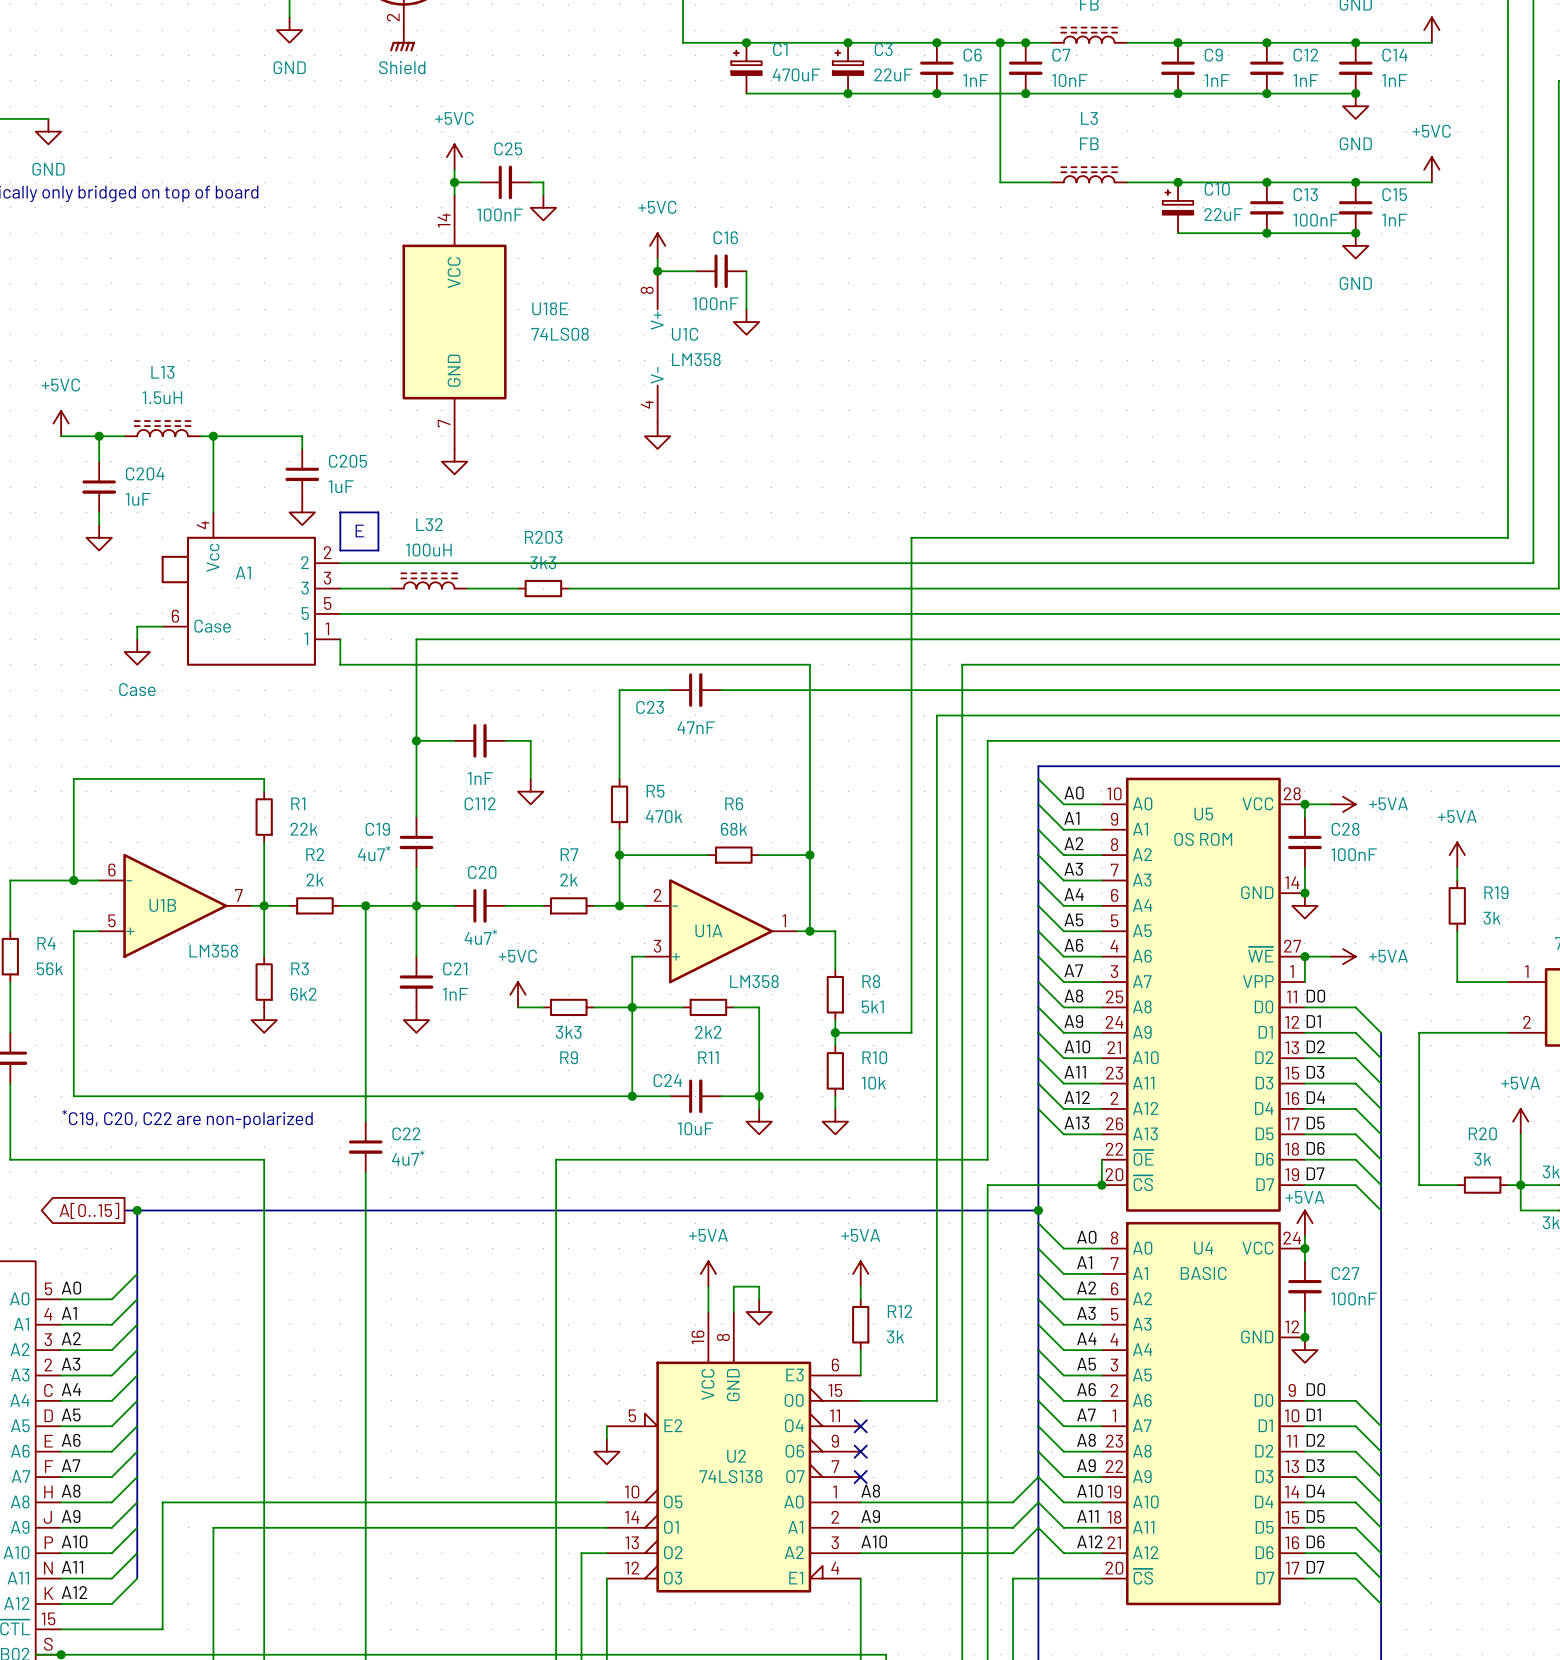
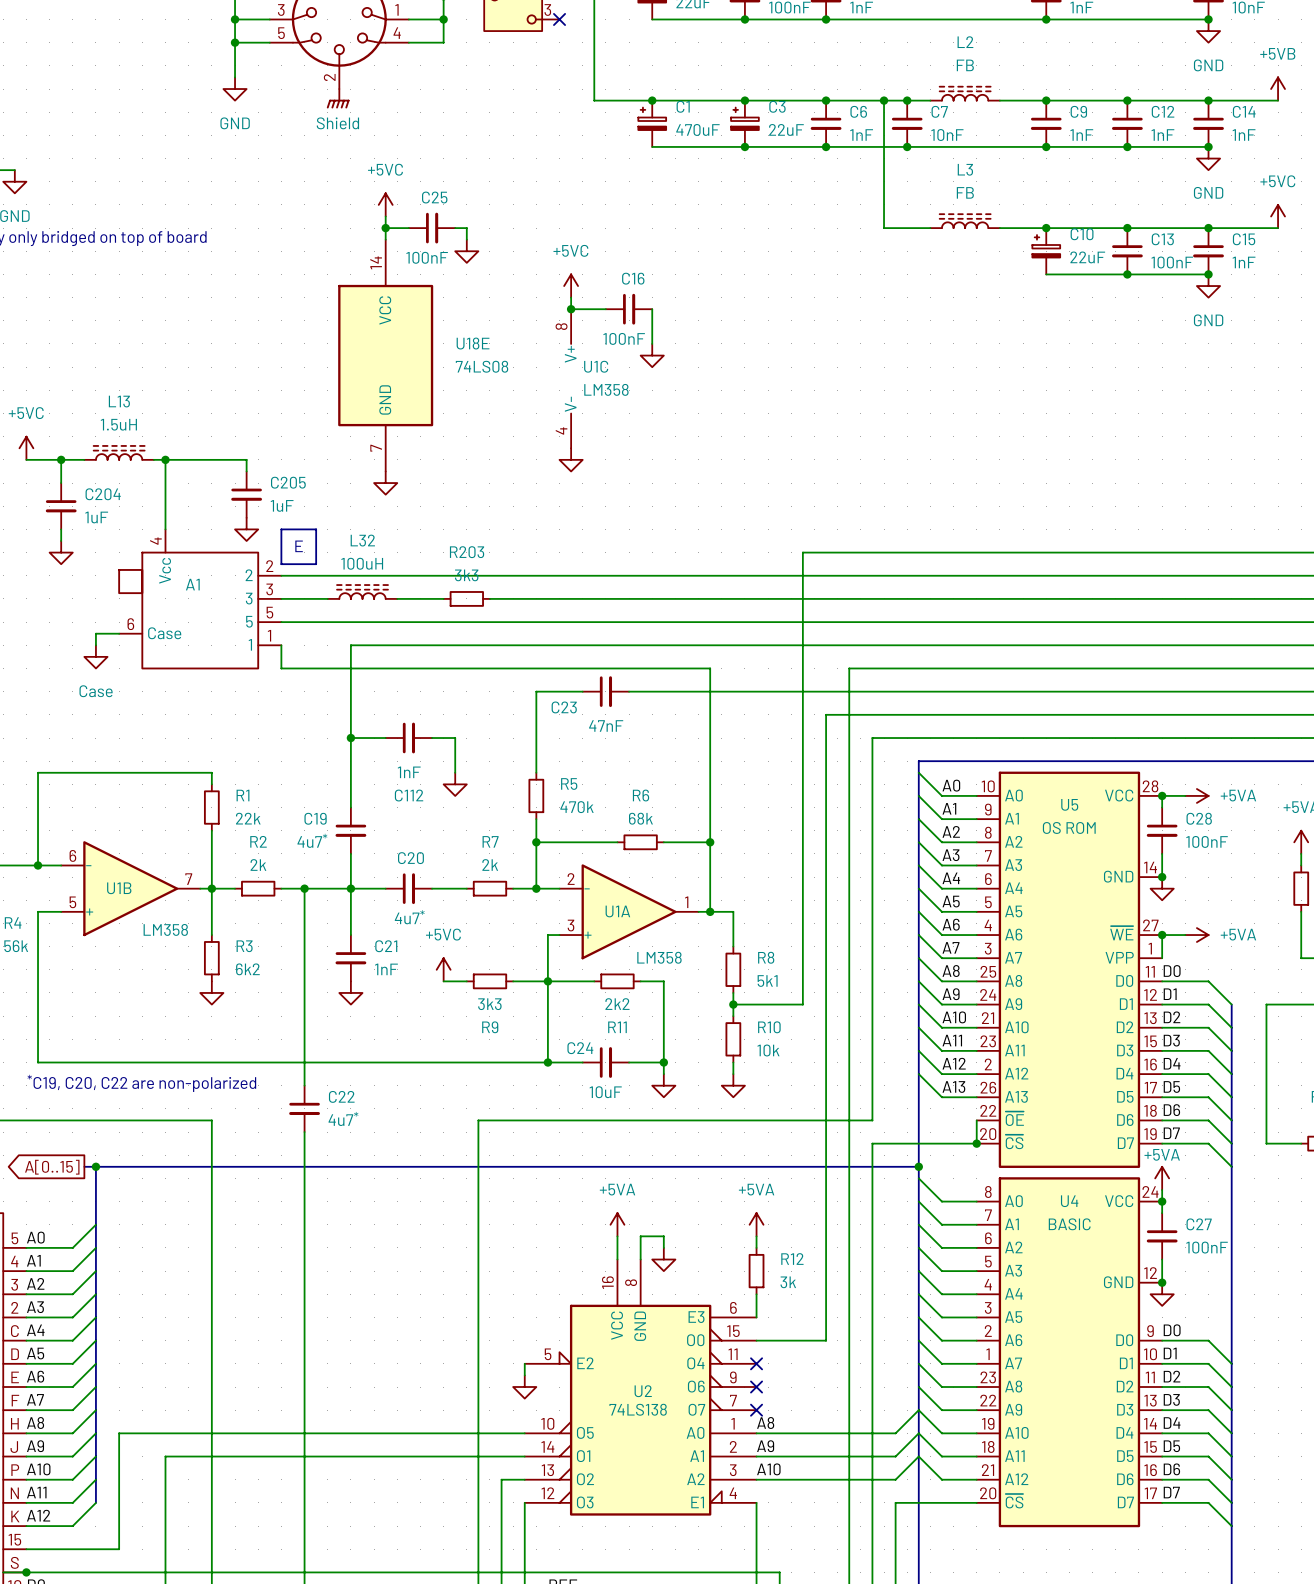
label: A0 (1086, 1237) -> none
label: A1 (1084, 1262) -> none
label: A2 (1086, 1287) -> none
label: A3 (1086, 1313) -> none
label: A4 (1086, 1338) -> none
label: A5 (1086, 1364) -> none
label: A6 (1086, 1389) -> none
label: A7 (1086, 1414) -> none
label: A8 (1086, 1440) -> none
label: A9 (1086, 1465) -> none
label: A10 (1089, 1491) -> none
label: A11 (1087, 1516) -> none
label: A12 (1089, 1541) -> none

